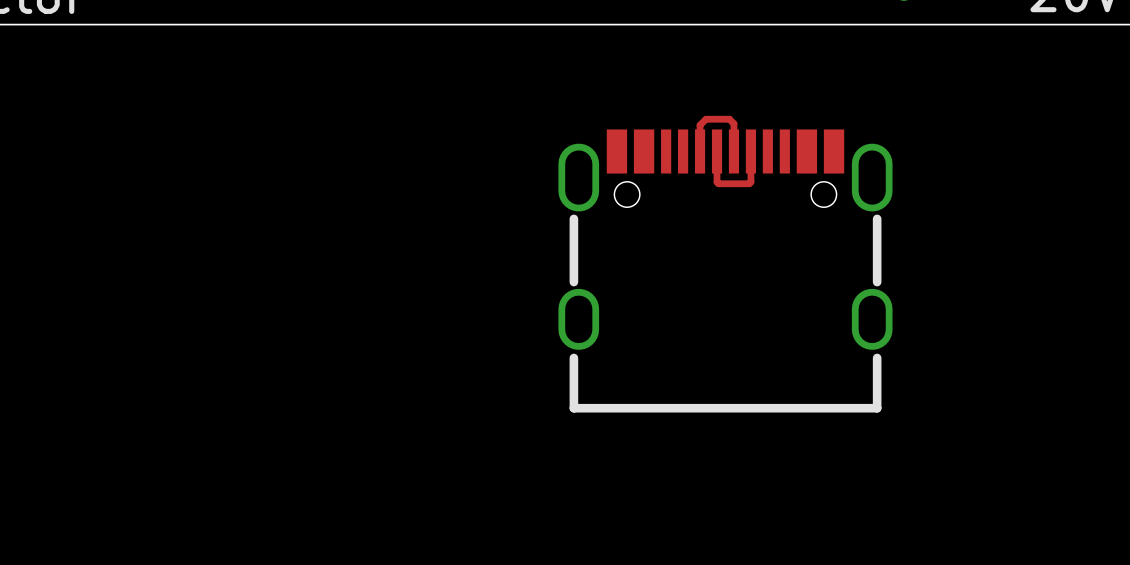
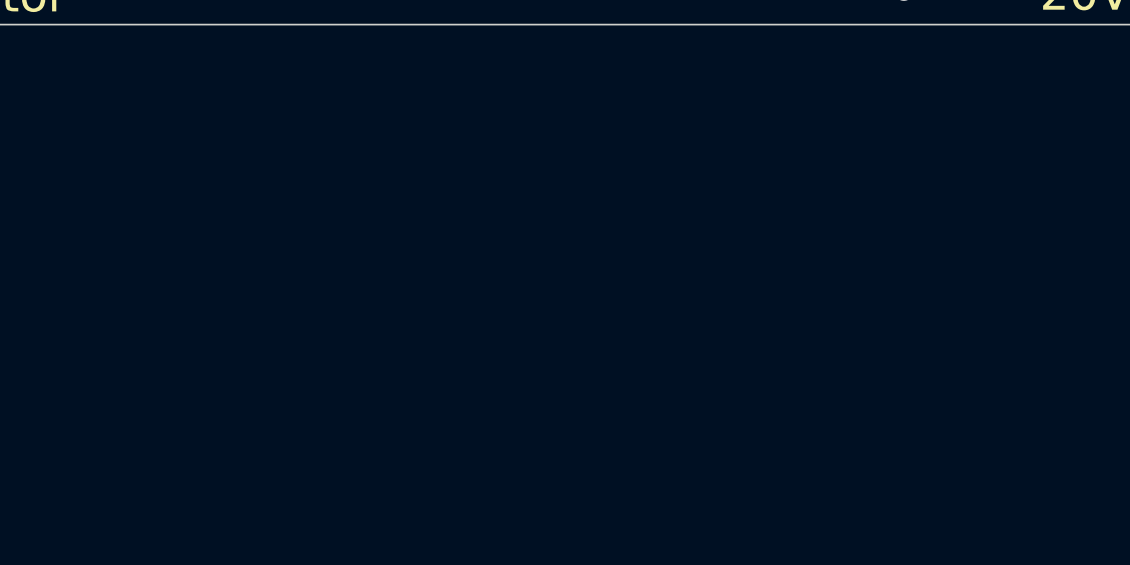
top track: (700, 151) (700, 125) (706, 119) (729, 119) (733, 123) (733, 151) -> none
top track: (717, 151) (717, 182) (718, 183) (749, 183) (750, 182) (750, 151) -> none
part: (725, 270) -> none

